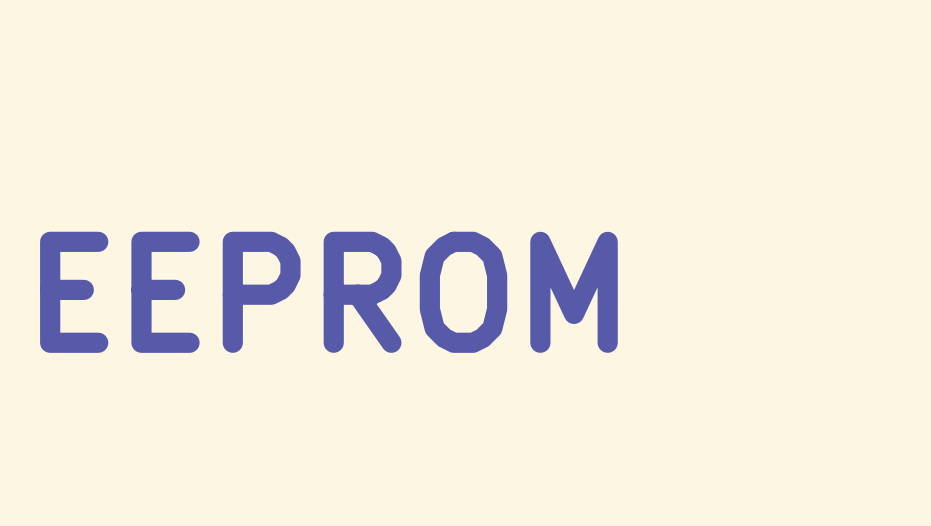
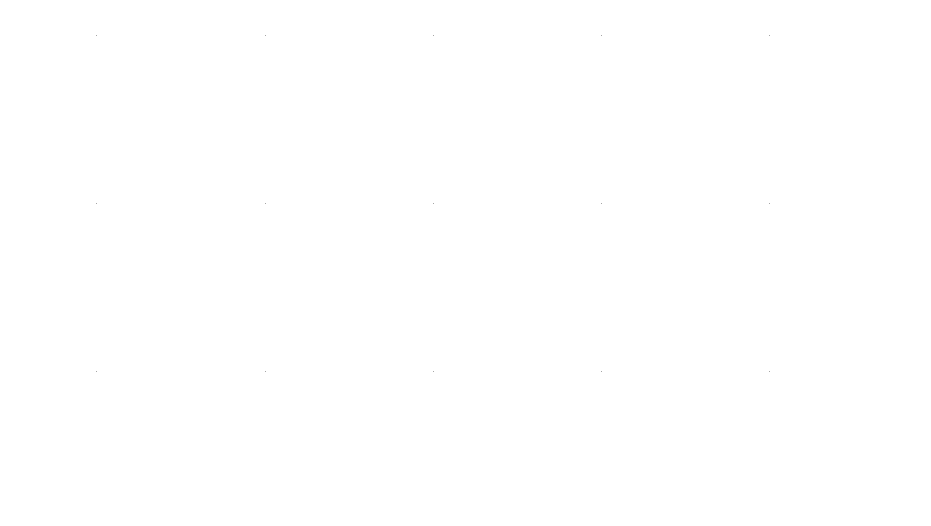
text: EEPROM (328, 292) -> none

